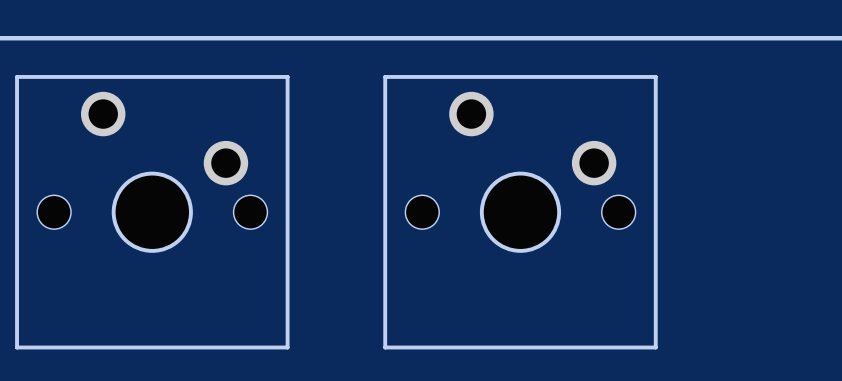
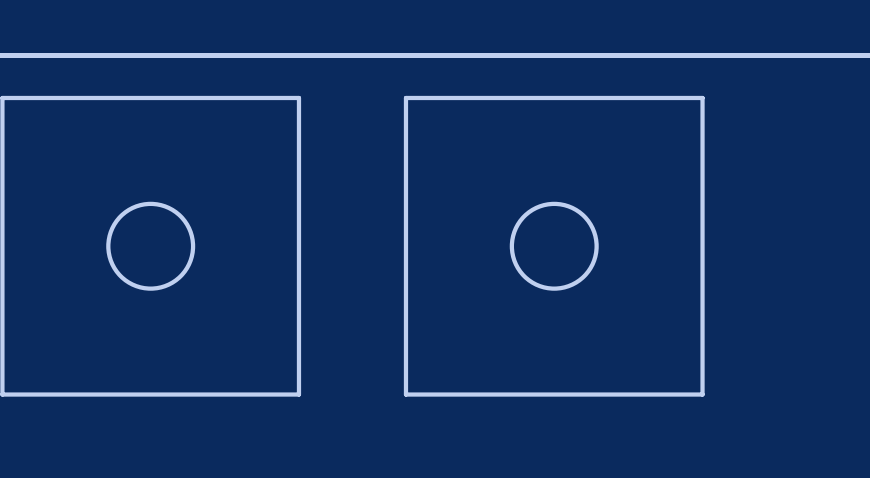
part: (152, 171) -> none
part: (520, 171) -> none

